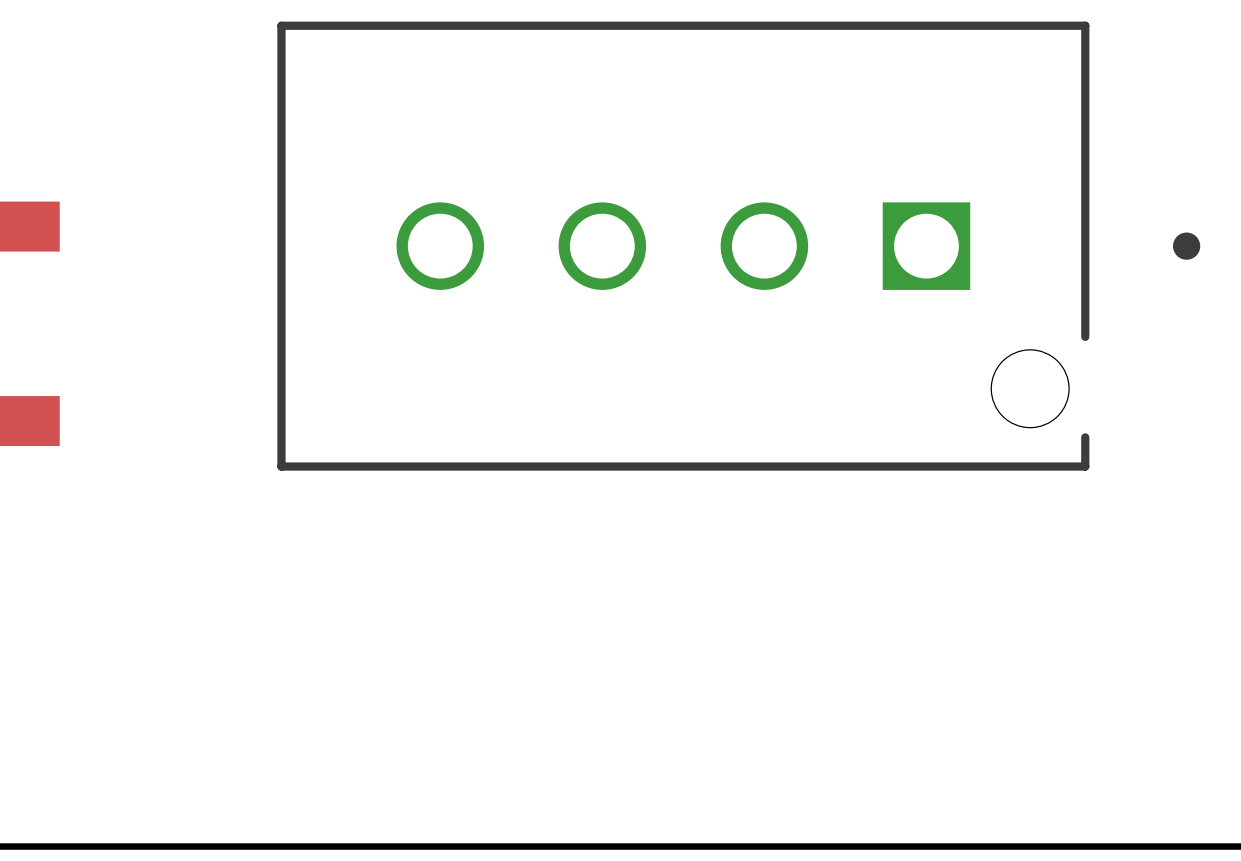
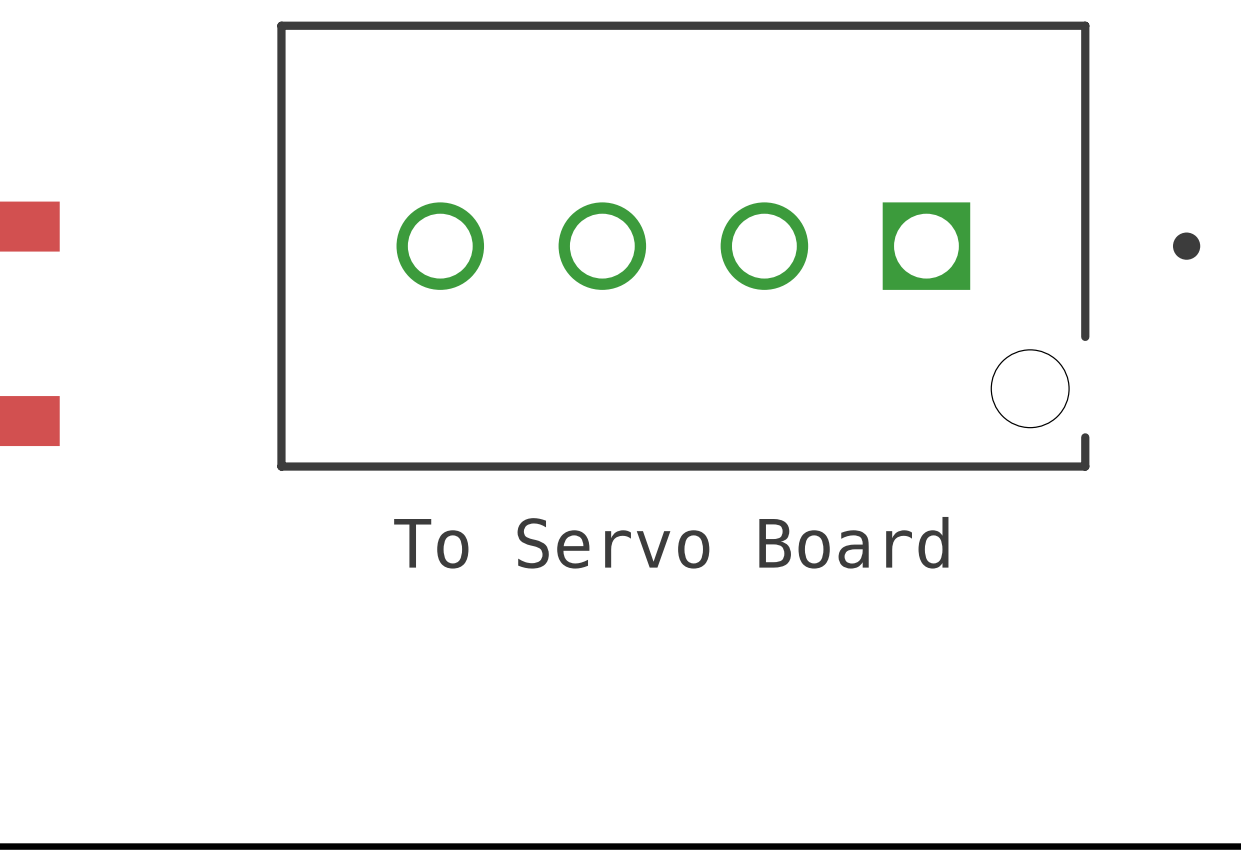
text: none -> To Servo Board (671, 542)

